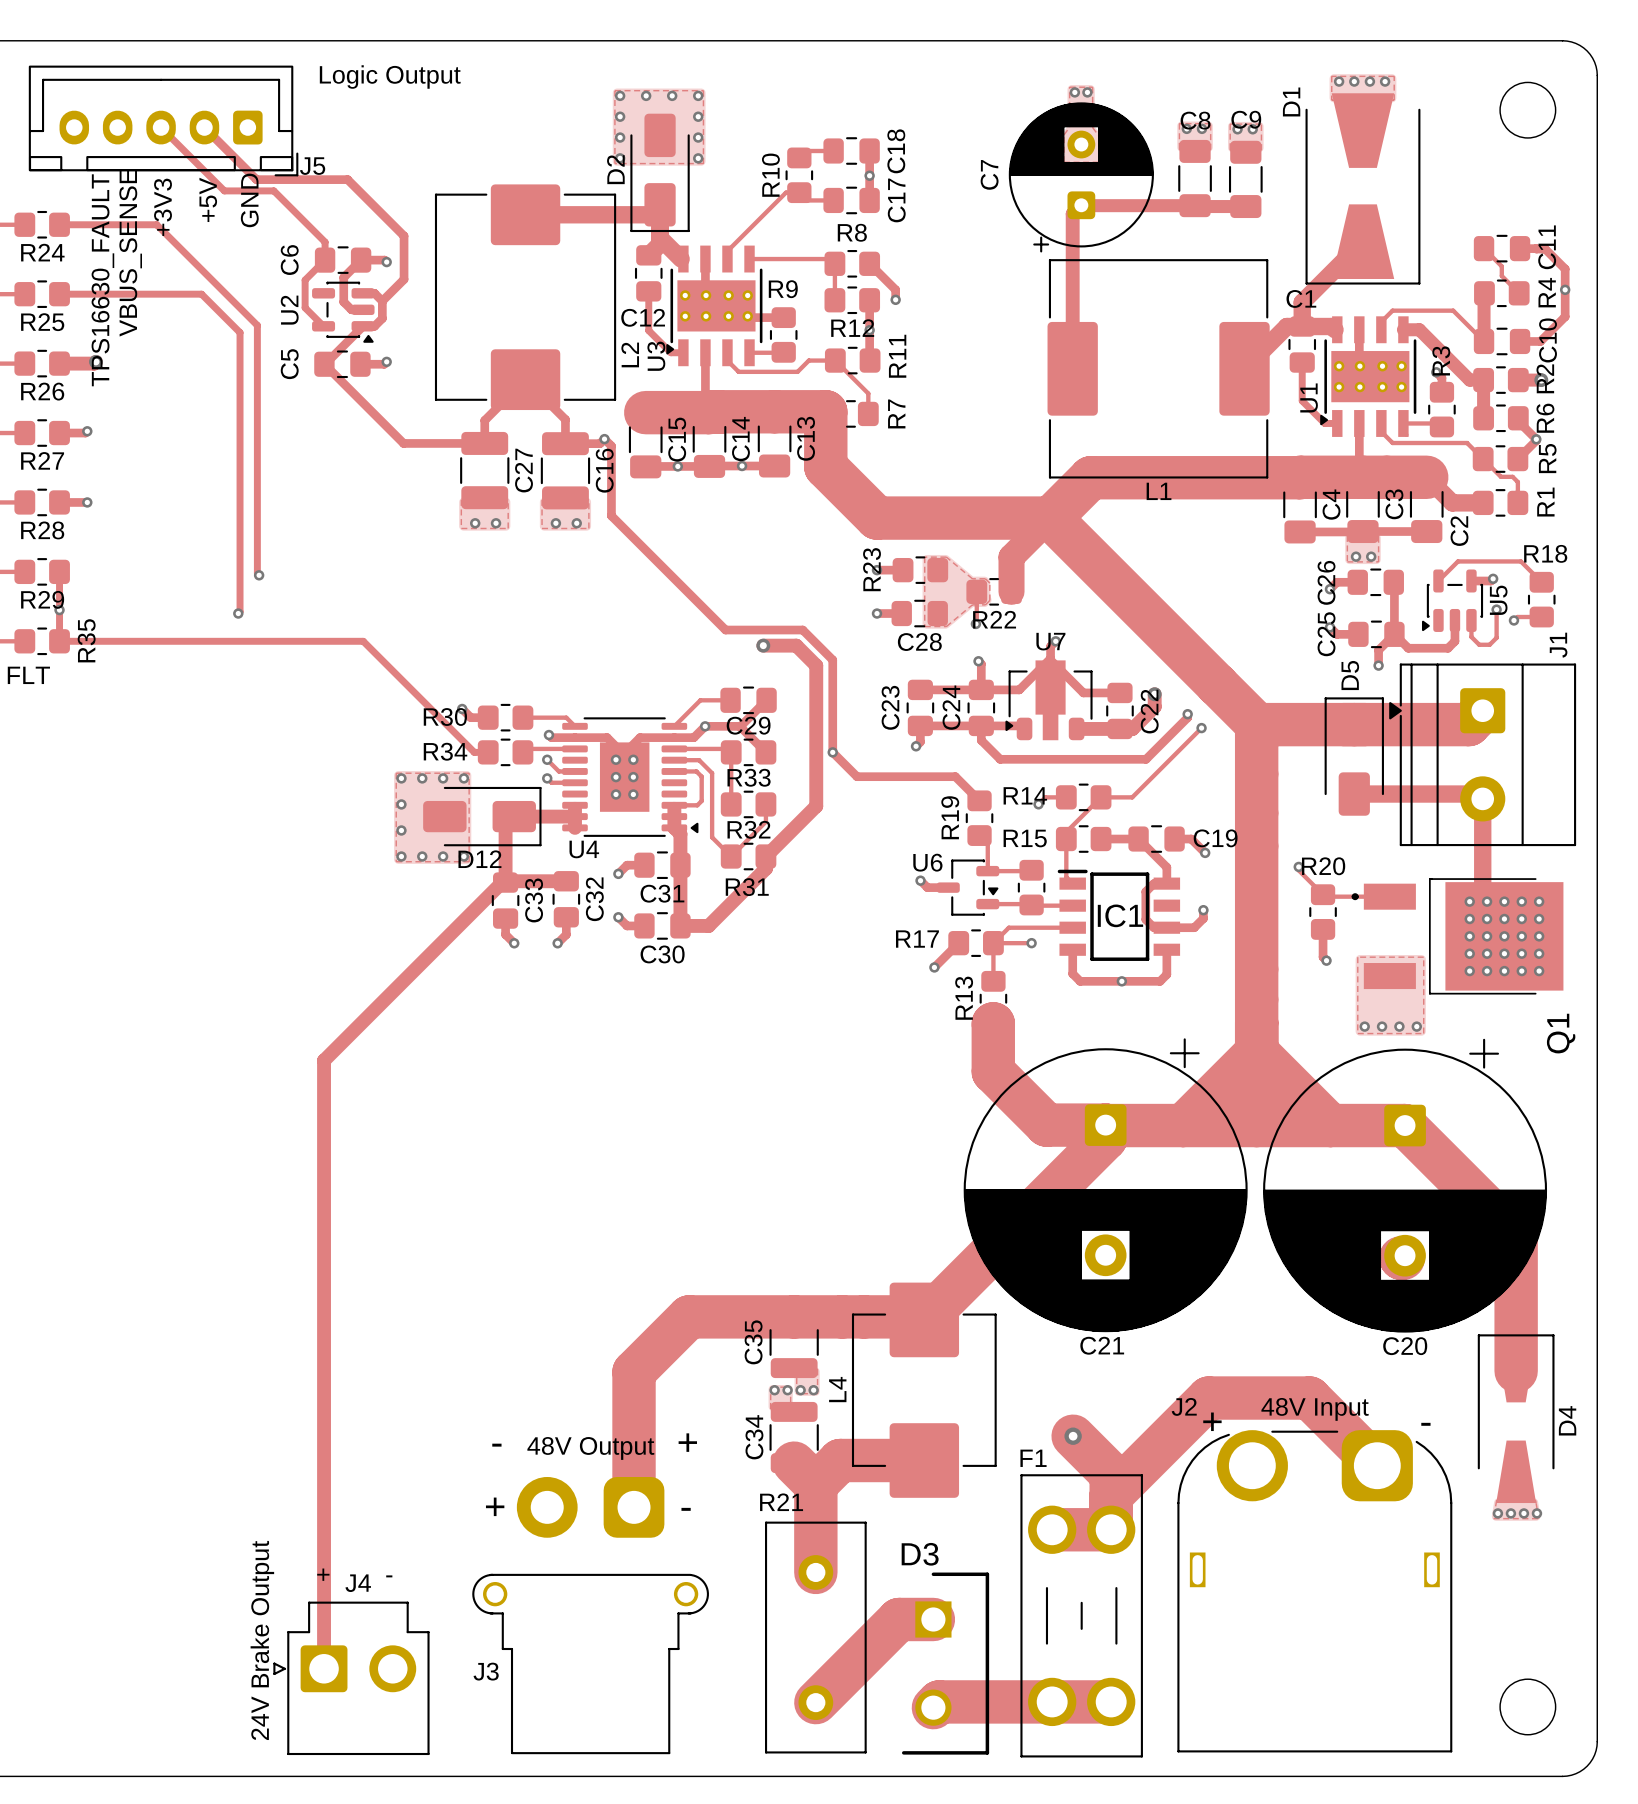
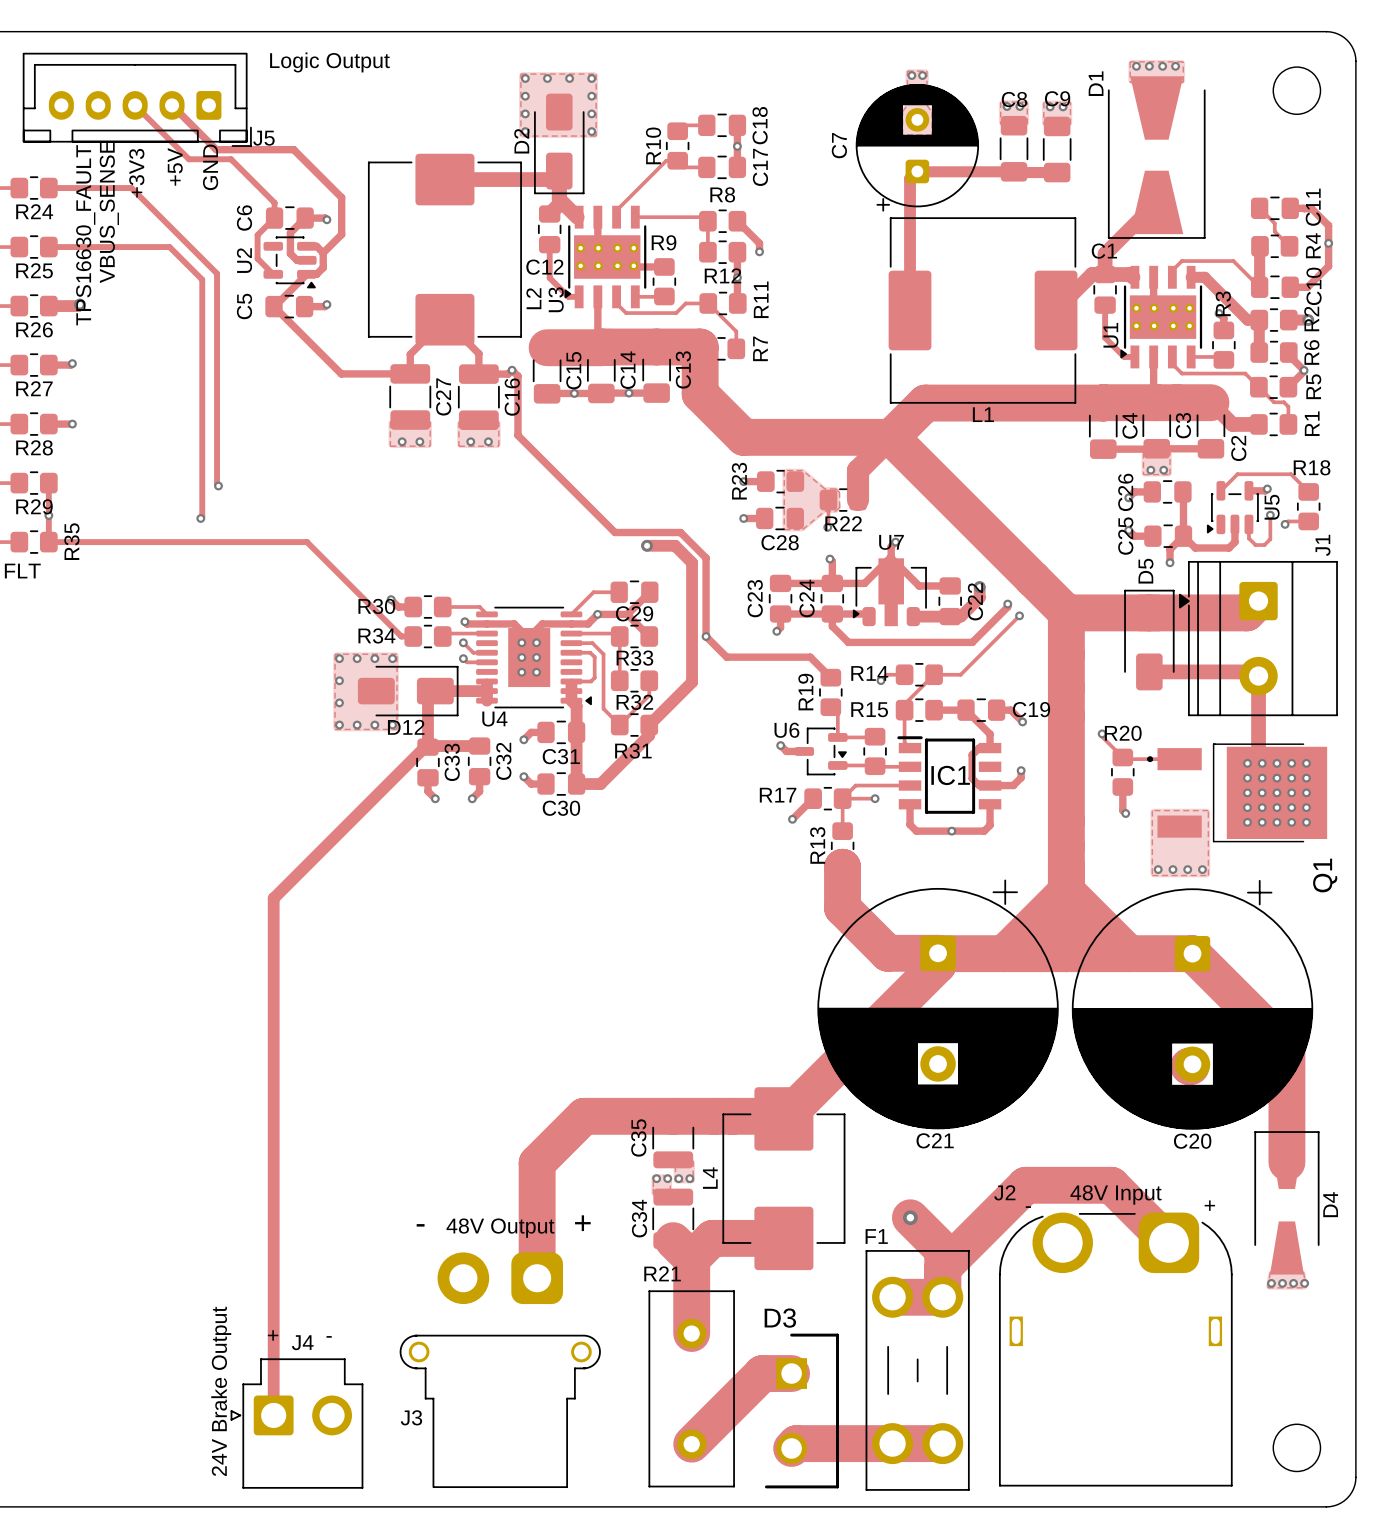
J2 text: + (1212, 1421) -> none
text: none -> + (1209, 1205)
text: none -> - (1028, 1207)
J2 text: - (1425, 1424) -> none
J3 text: + (495, 1506) -> none
J3 text: - (686, 1509) -> none

